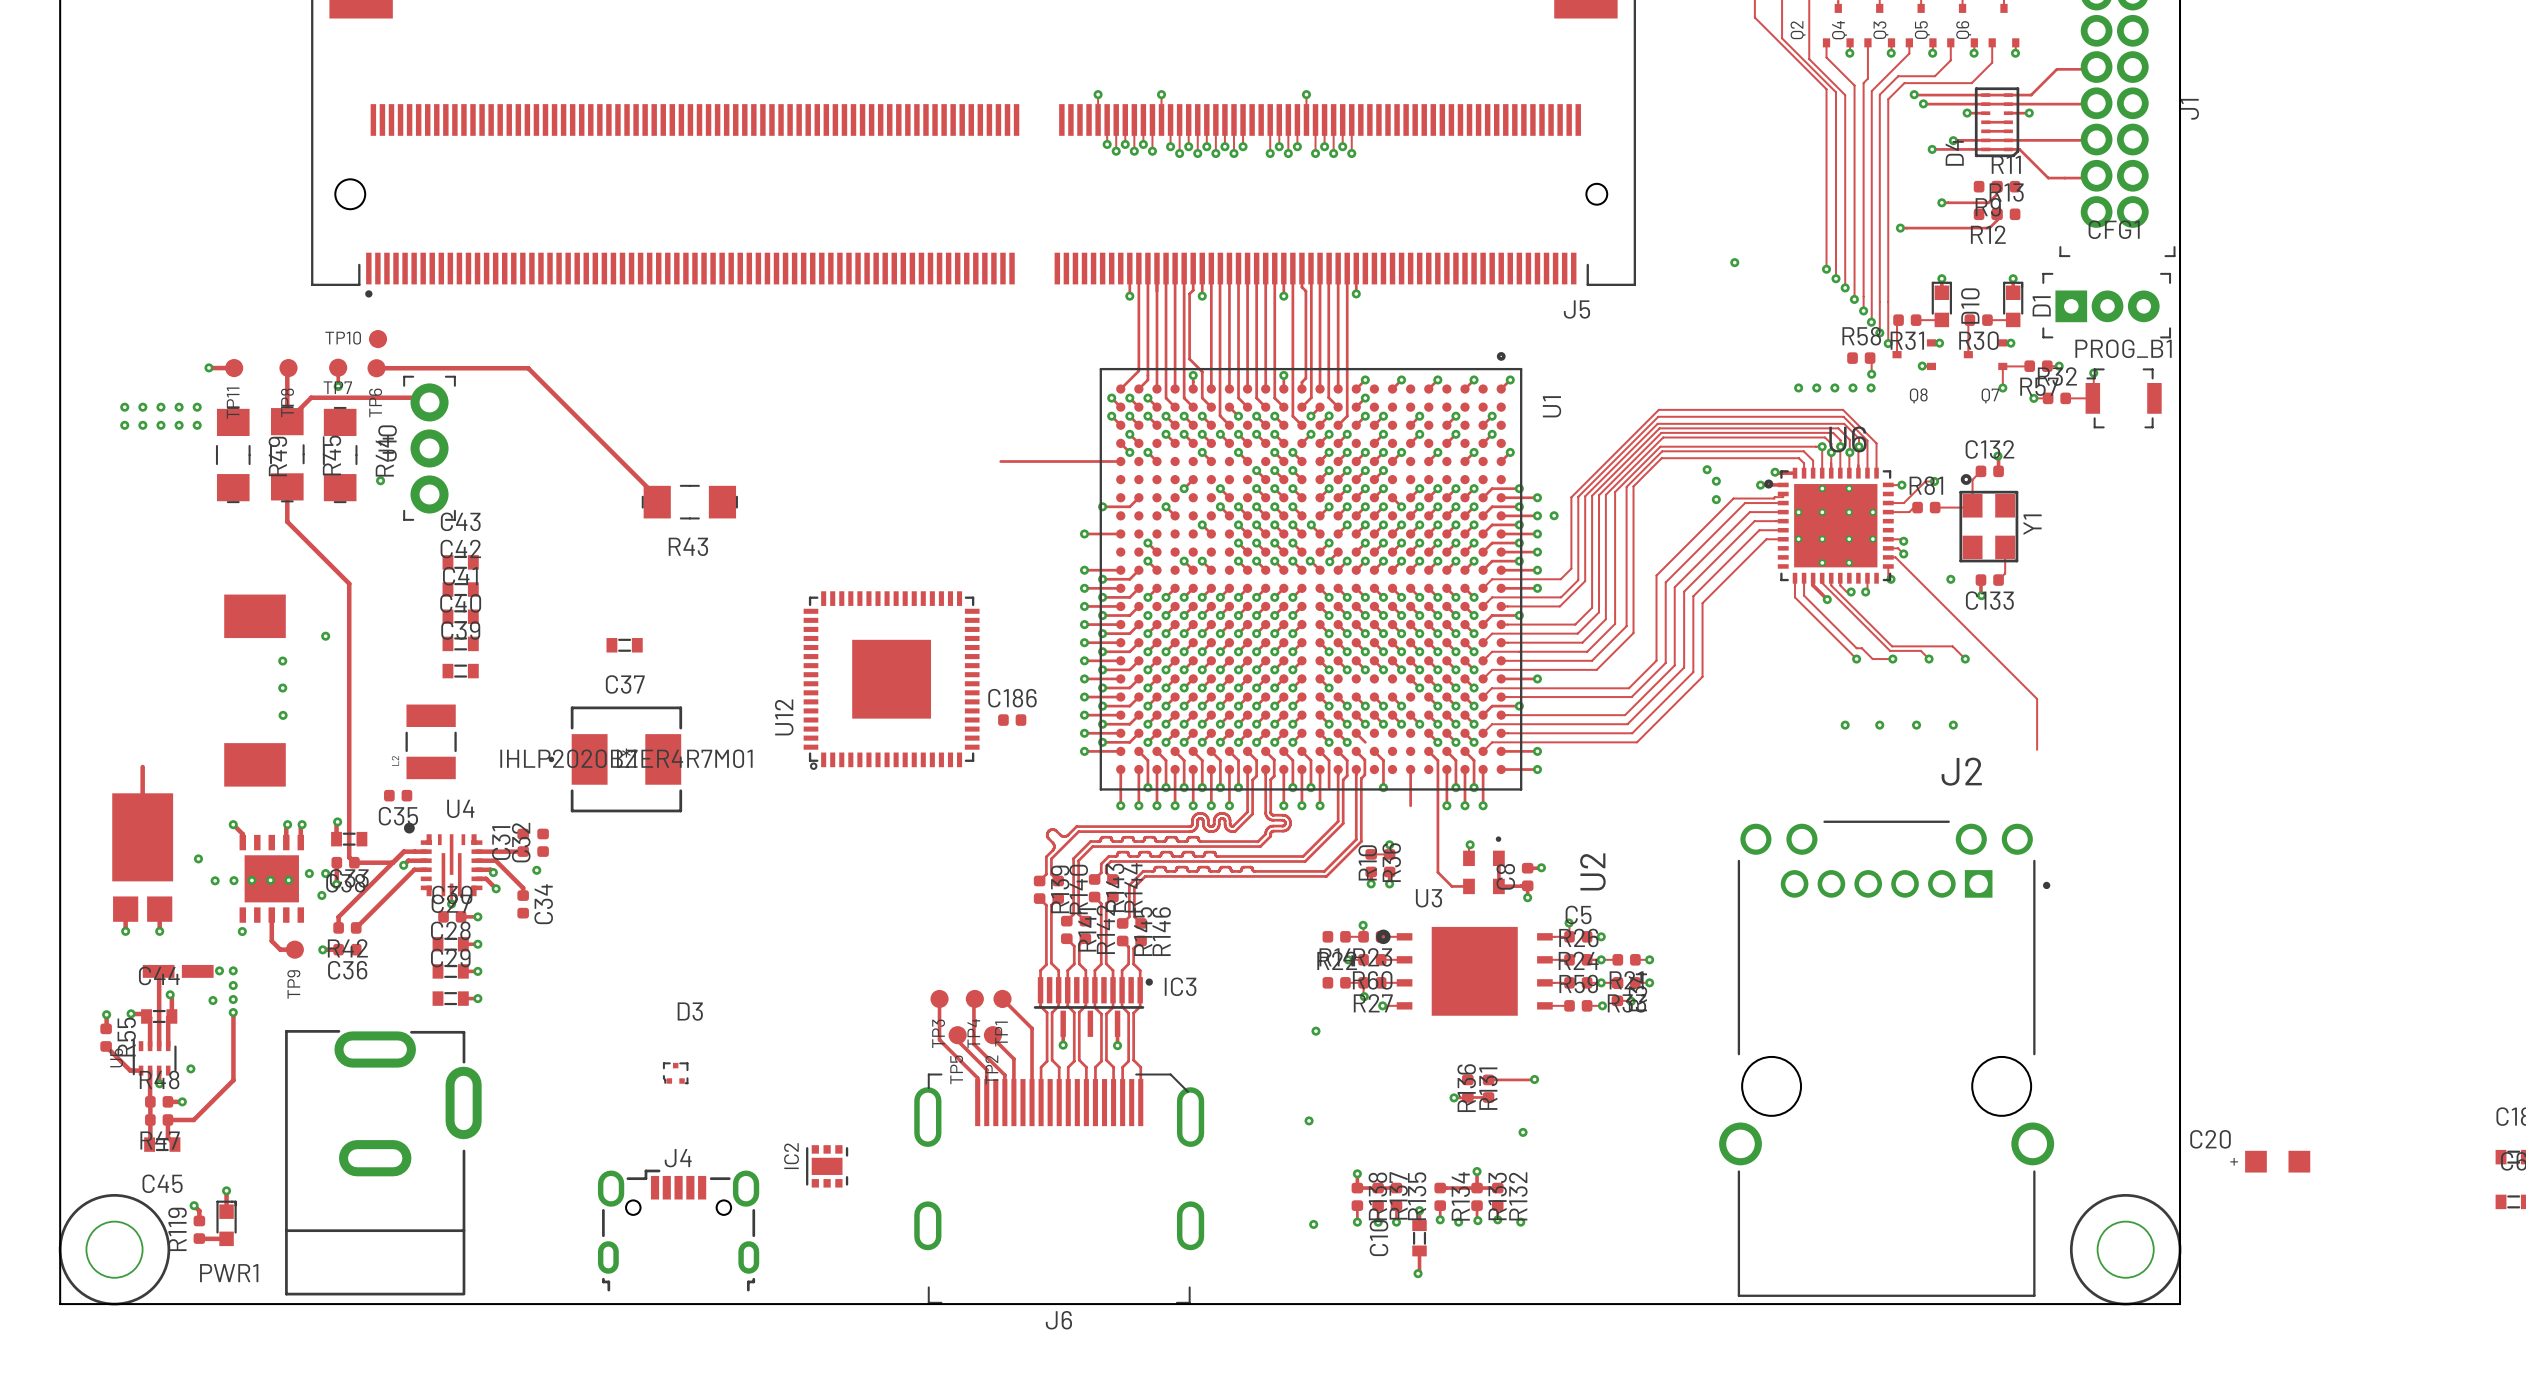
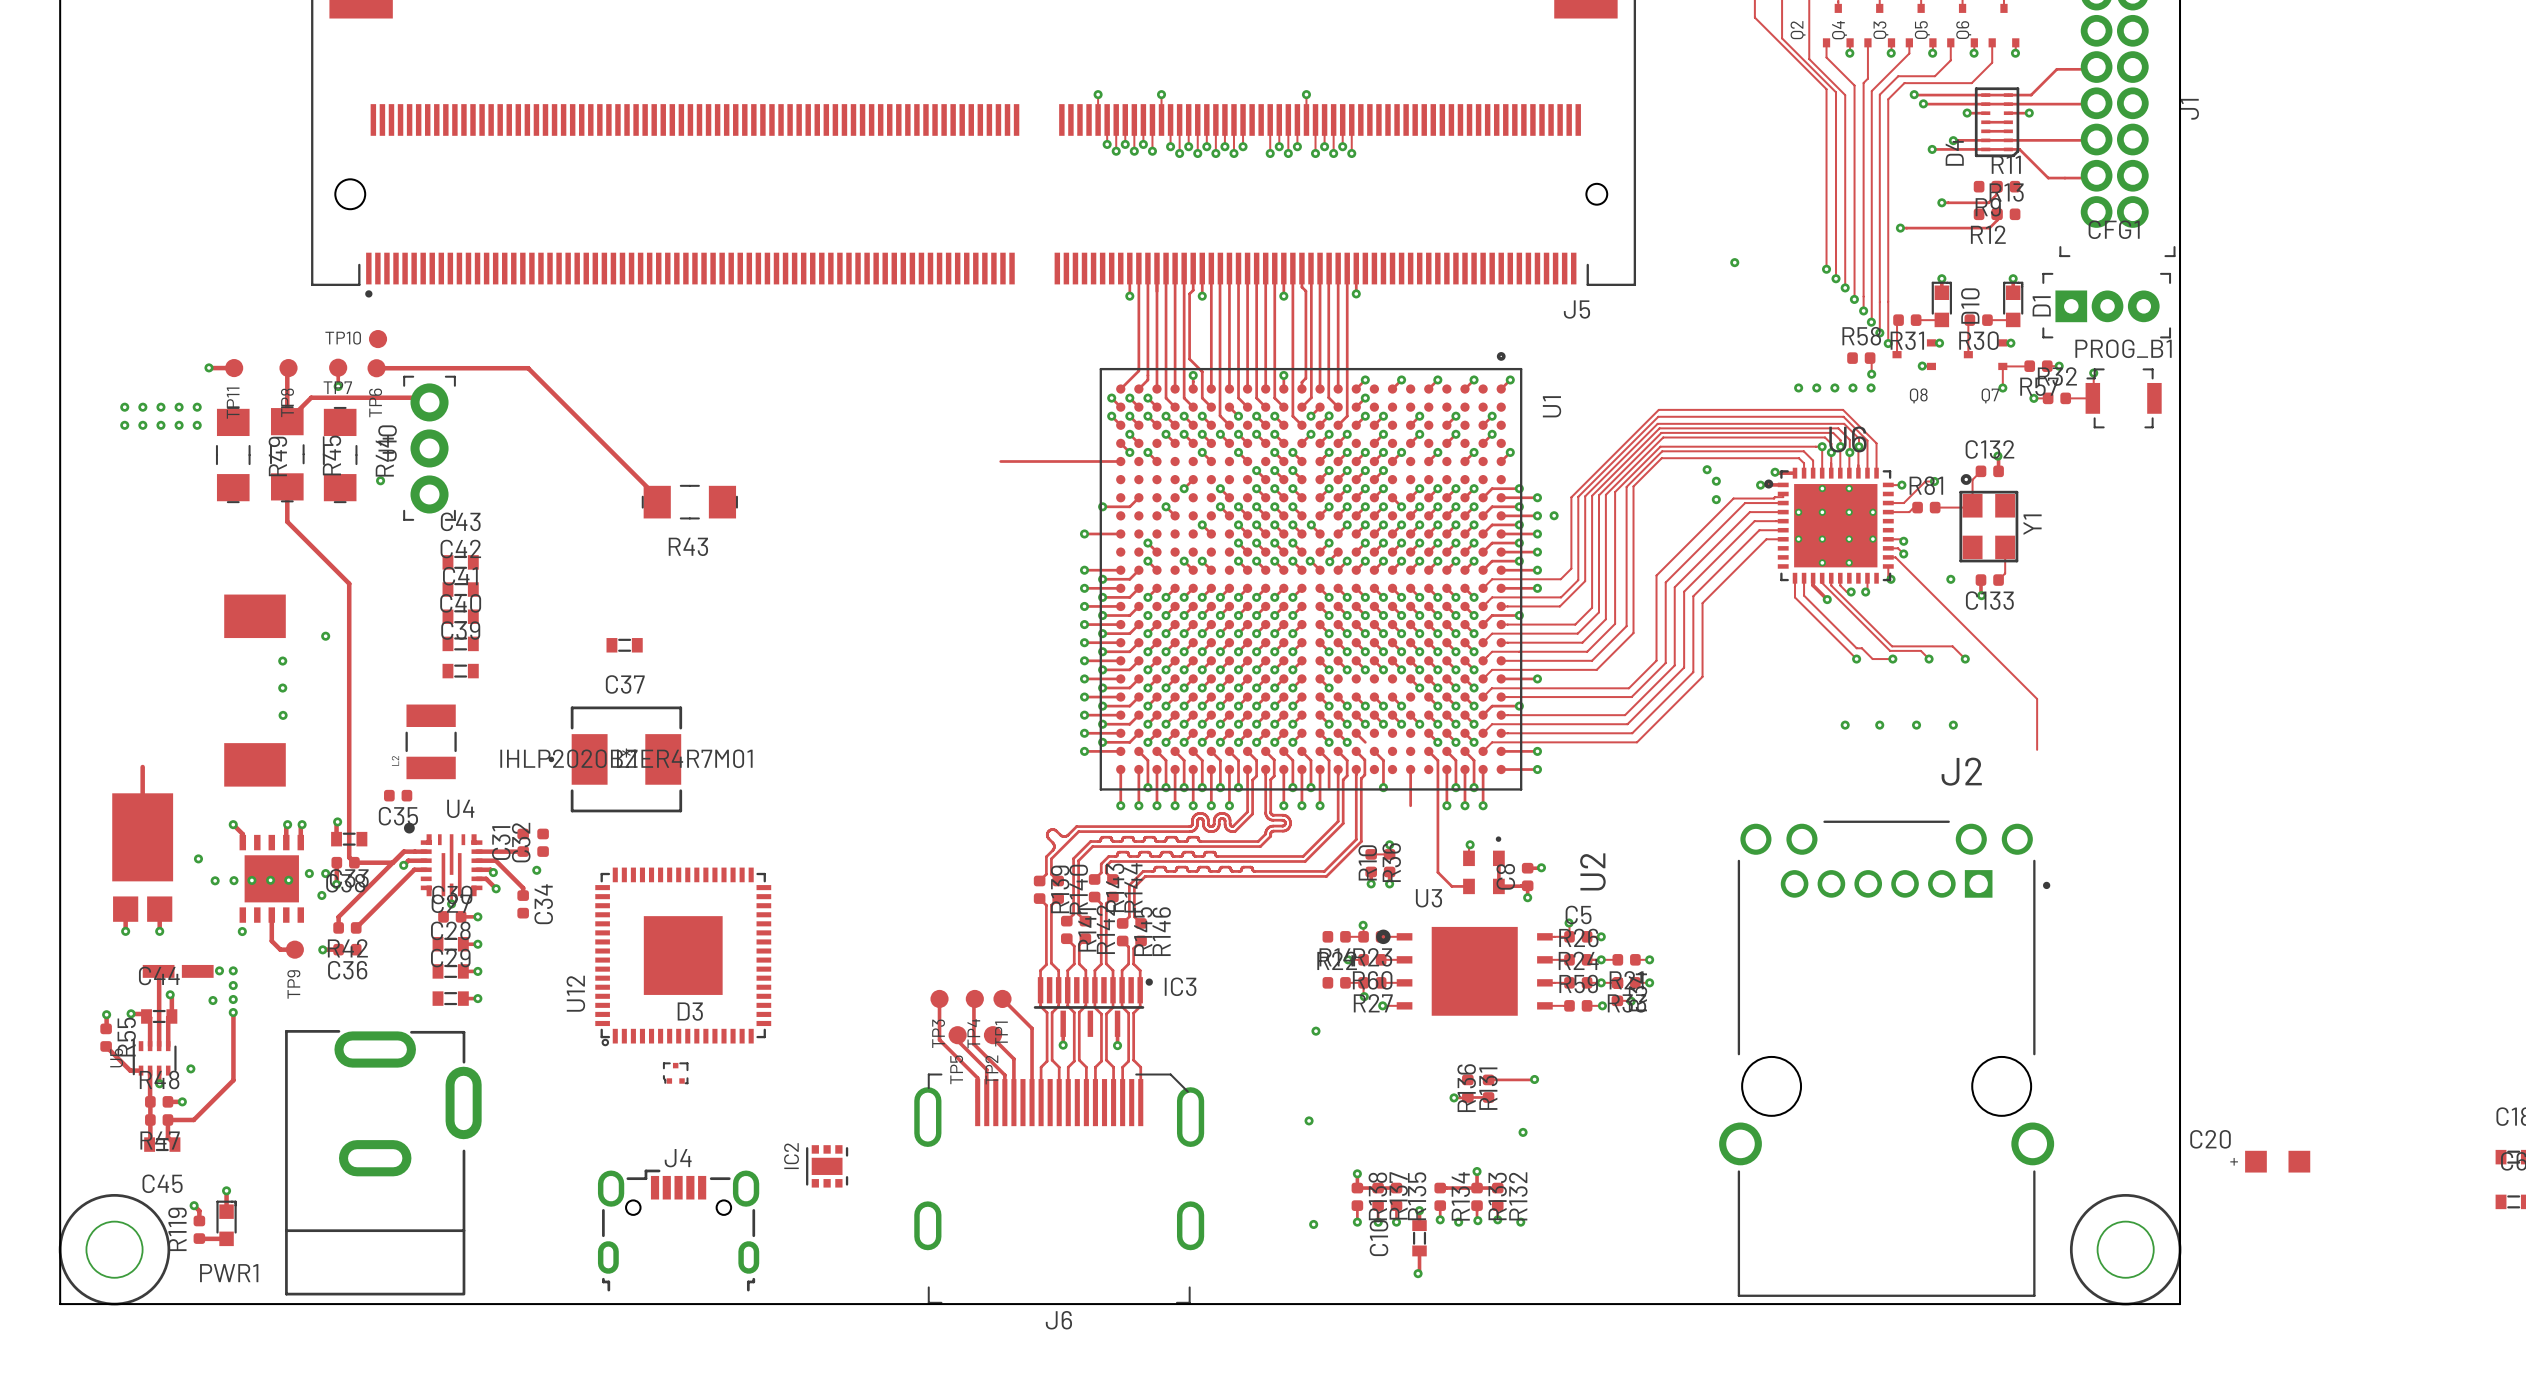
U12 position: (891, 680) -> (683, 956)
C186: (1012, 720) -> none

